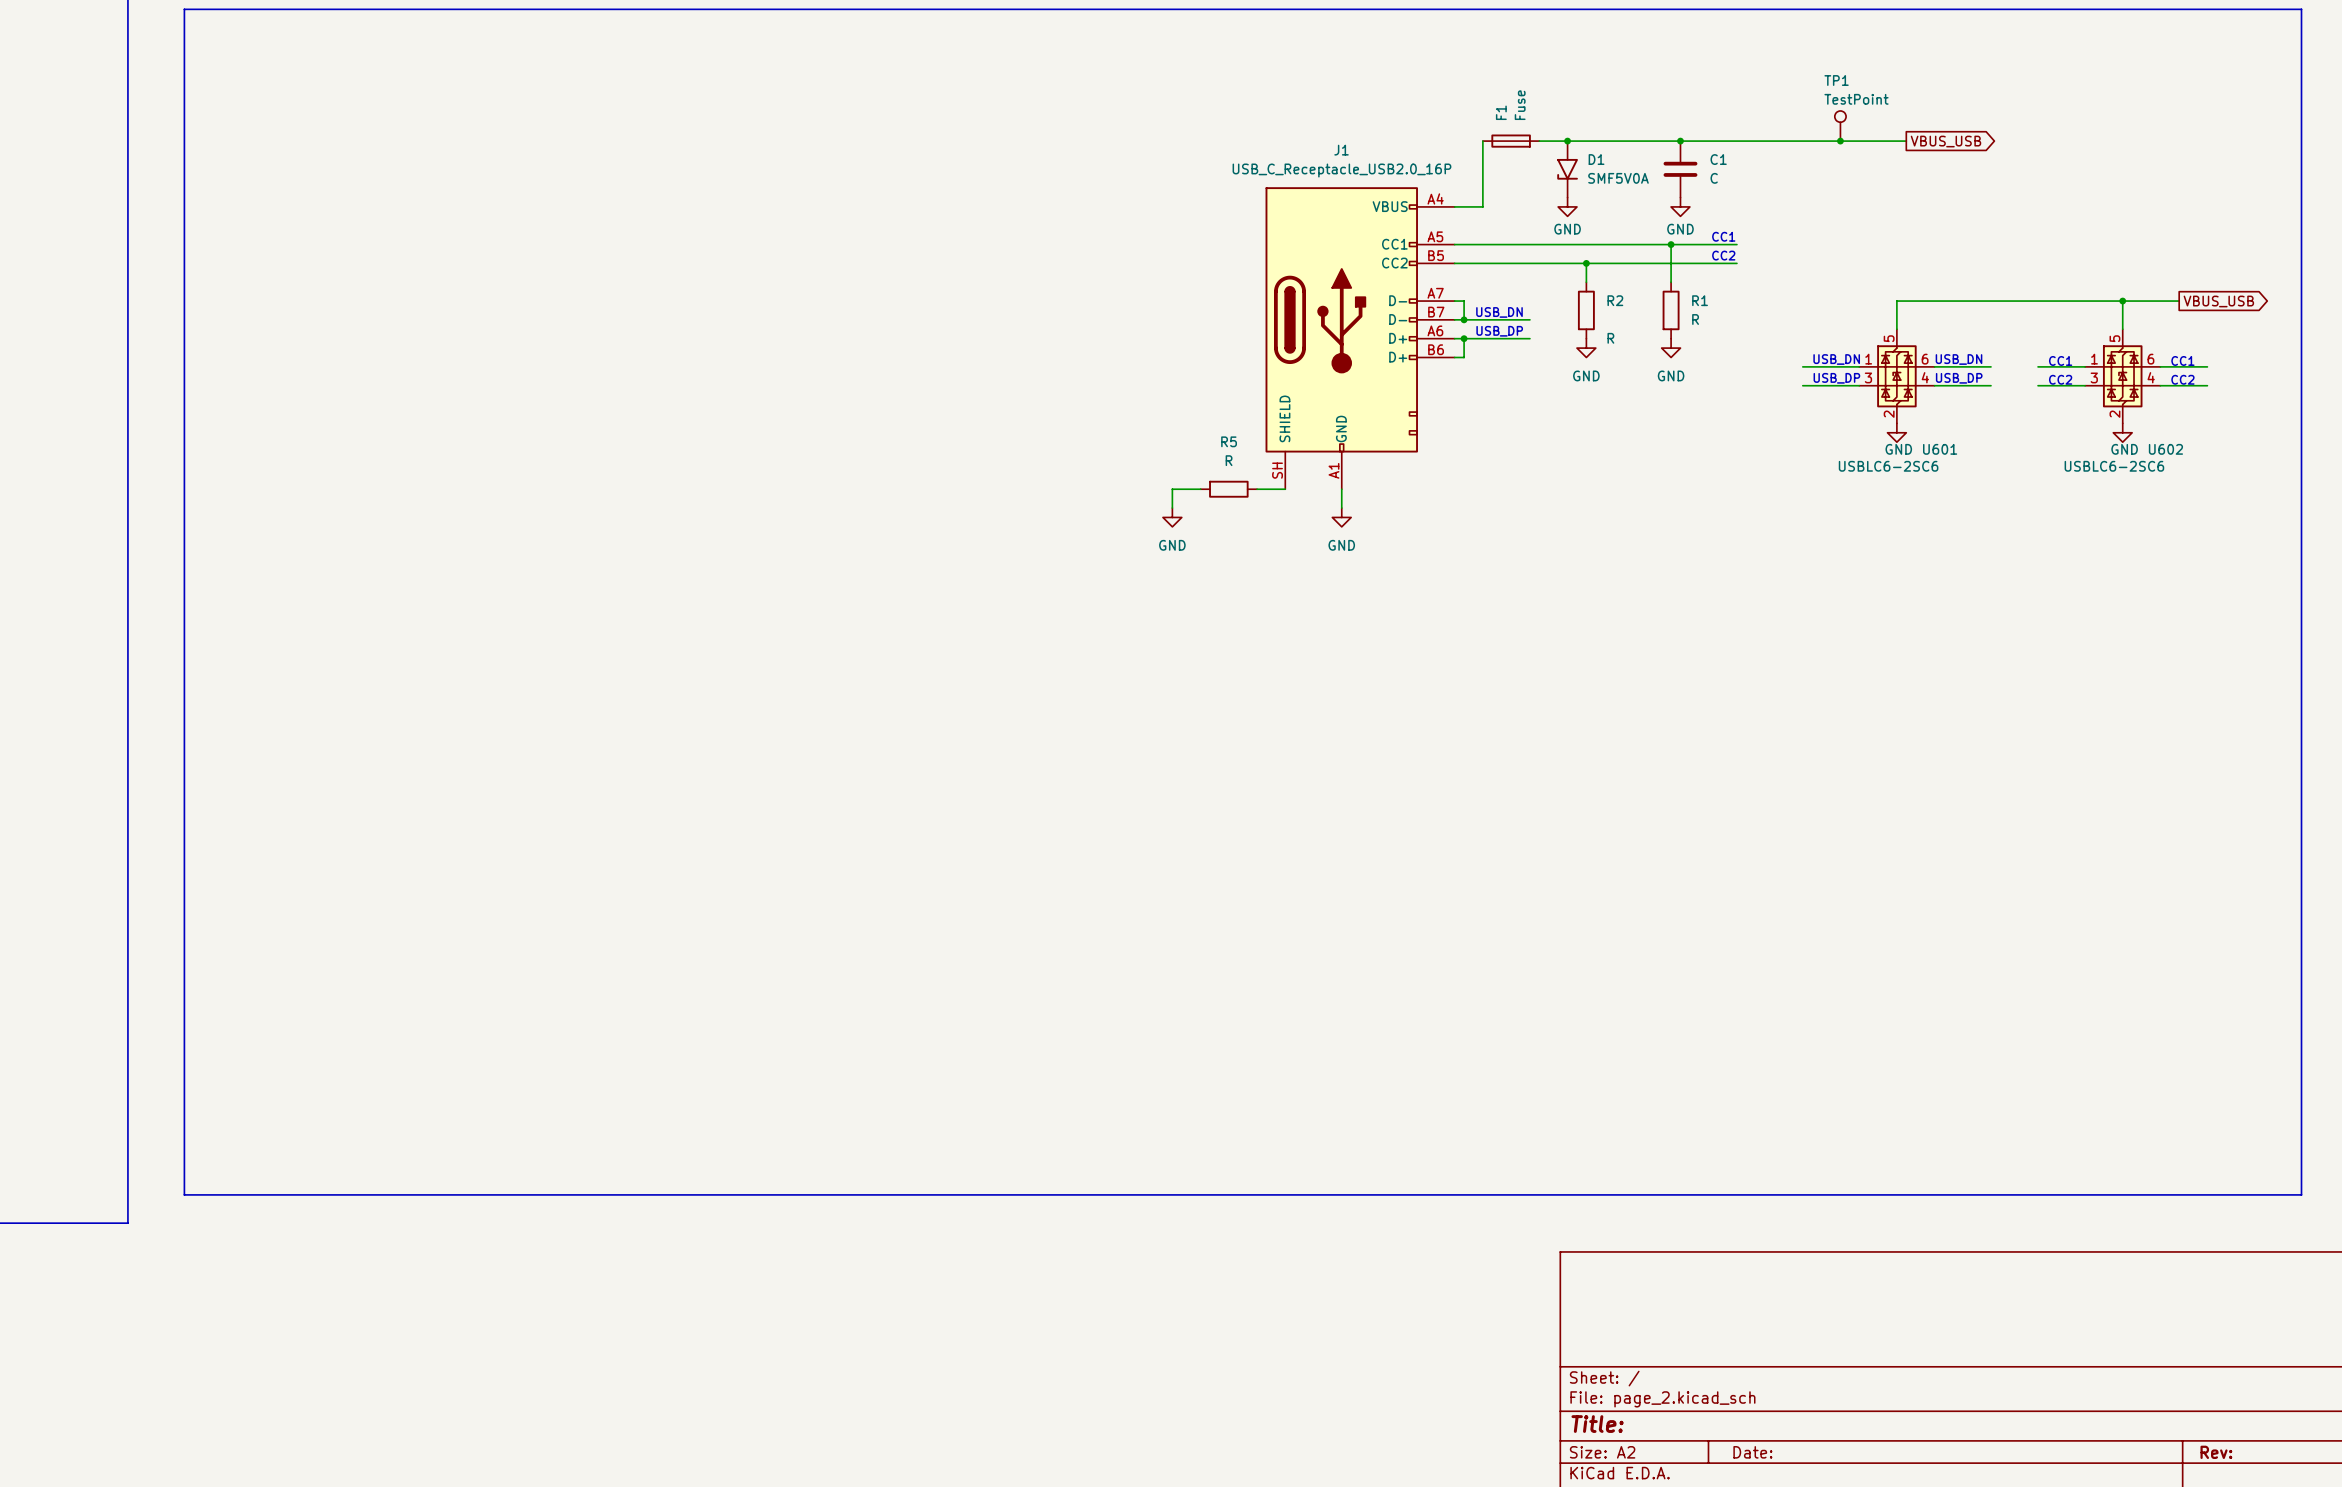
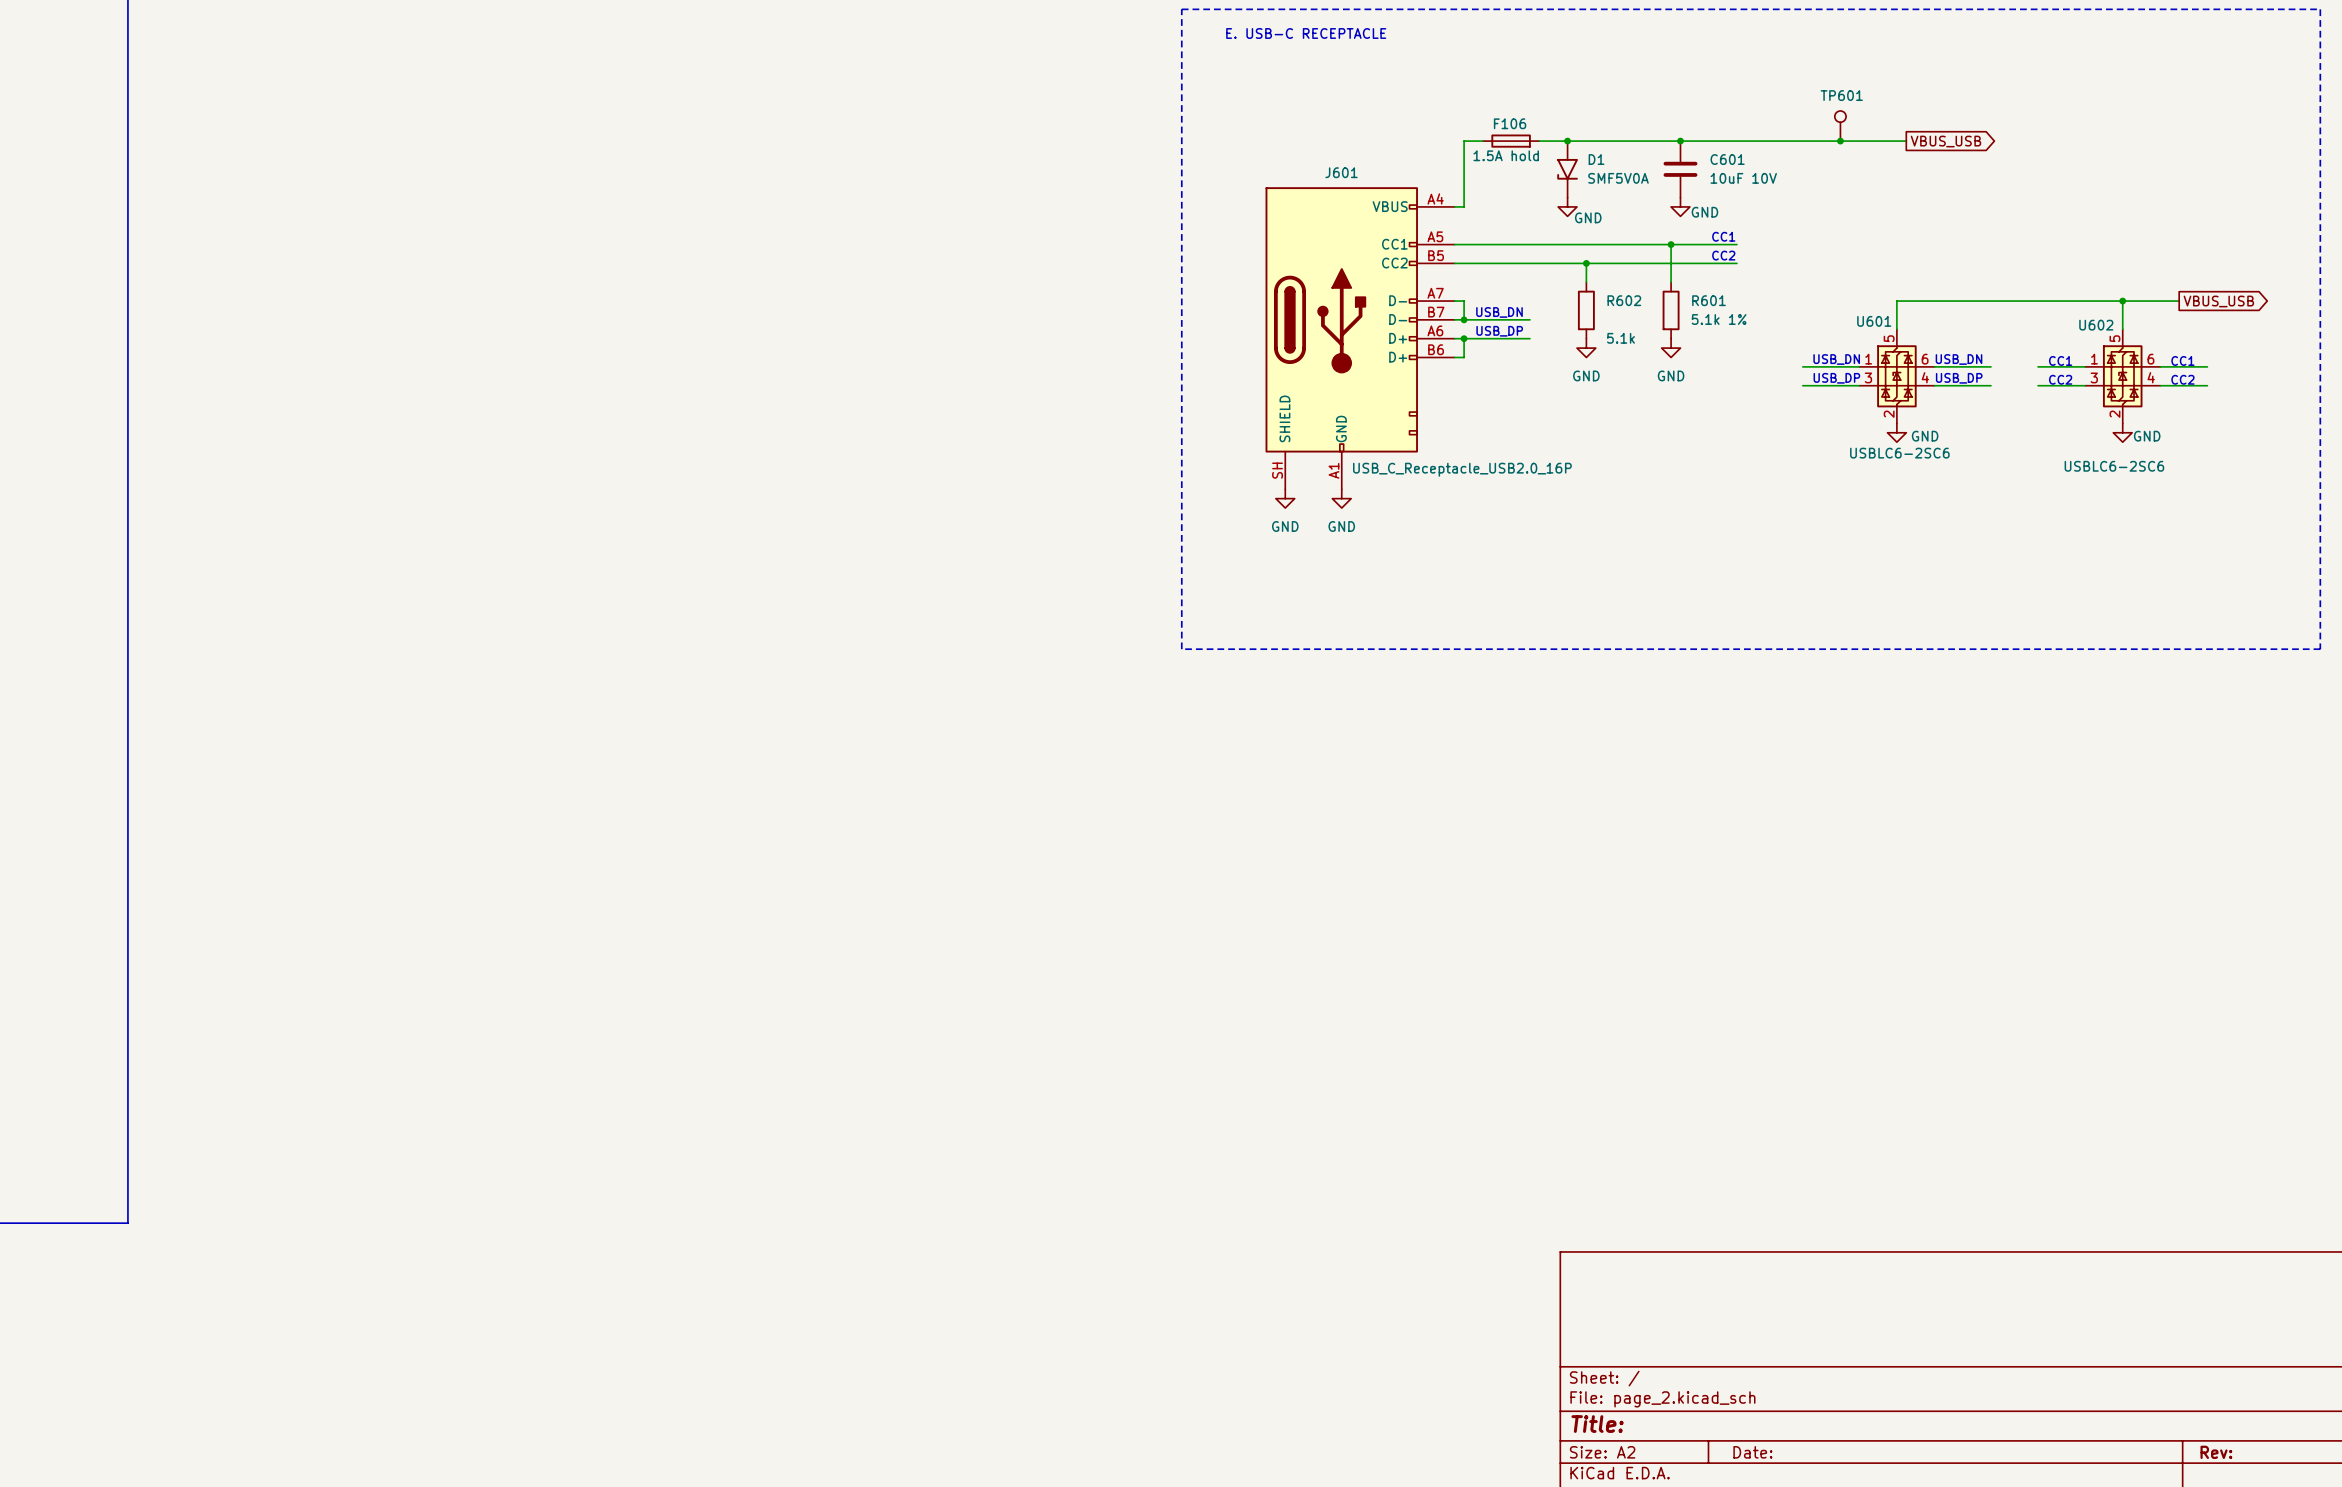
line: (184, 9) (2301, 9) (2301, 1194) (184, 1194) (184, 9) -> none
line: none -> (1181, 9) (2320, 9) (2320, 649) (1181, 649) (1181, 9)
text: none -> E. USB-C RECEPTACLE (1306, 33)
TP1 name: TP1 (1836, 80) -> TP601 (1841, 95)
TP1 value: TestPoint (1856, 99) -> none
F1 value: Fuse (1520, 105) -> 1.5A hold (1506, 155)
F1 name: F1 (1501, 112) -> F106 (1510, 123)
wire: (1482, 141) (1482, 206) (1464, 206) -> (1482, 141) (1464, 141) (1464, 206)
J1 name: J1 (1341, 150) -> J601 (1341, 172)
C1 name: C1 (1718, 159) -> C601 (1727, 159)
J1 value position: USB_C_Receptacle_USB2.0_16P (1341, 170) -> USB_C_Receptacle_USB2.0_16P (1462, 469)
C1 value: C (1714, 178) -> 10uF 10V (1743, 178)
power symbol text position: GND (1567, 229) -> GND (1588, 217)
power symbol text position: GND (1680, 229) -> GND (1704, 212)
R2 name: R2 (1615, 300) -> R602 (1624, 300)
R1 name: R1 (1700, 300) -> R601 (1709, 300)
R1 value: R (1695, 319) -> 5.1k 1% (1719, 319)
R2 value: R (1610, 338) -> 5.1k (1620, 338)
power symbol text position: GND (1898, 449) -> GND (1925, 436)
U601 name position: U601 (1940, 449) -> U601 (1874, 321)
power symbol text position: GND (2124, 449) -> GND (2147, 436)
U602 name position: U602 (2165, 449) -> U602 (2096, 325)
U601 value position: USBLC6-2SC6 (1888, 466) -> USBLC6-2SC6 (1899, 453)
wire: (1200, 489) (1172, 489) (1172, 508) -> none
R5: R (1228, 489) -> none
wire: (1257, 489) (1285, 489) -> none
power symbol: none -> GND (1285, 498)
power symbol: GND (1172, 517) -> none
power symbol position: GND (1341, 517) -> GND (1341, 498)

